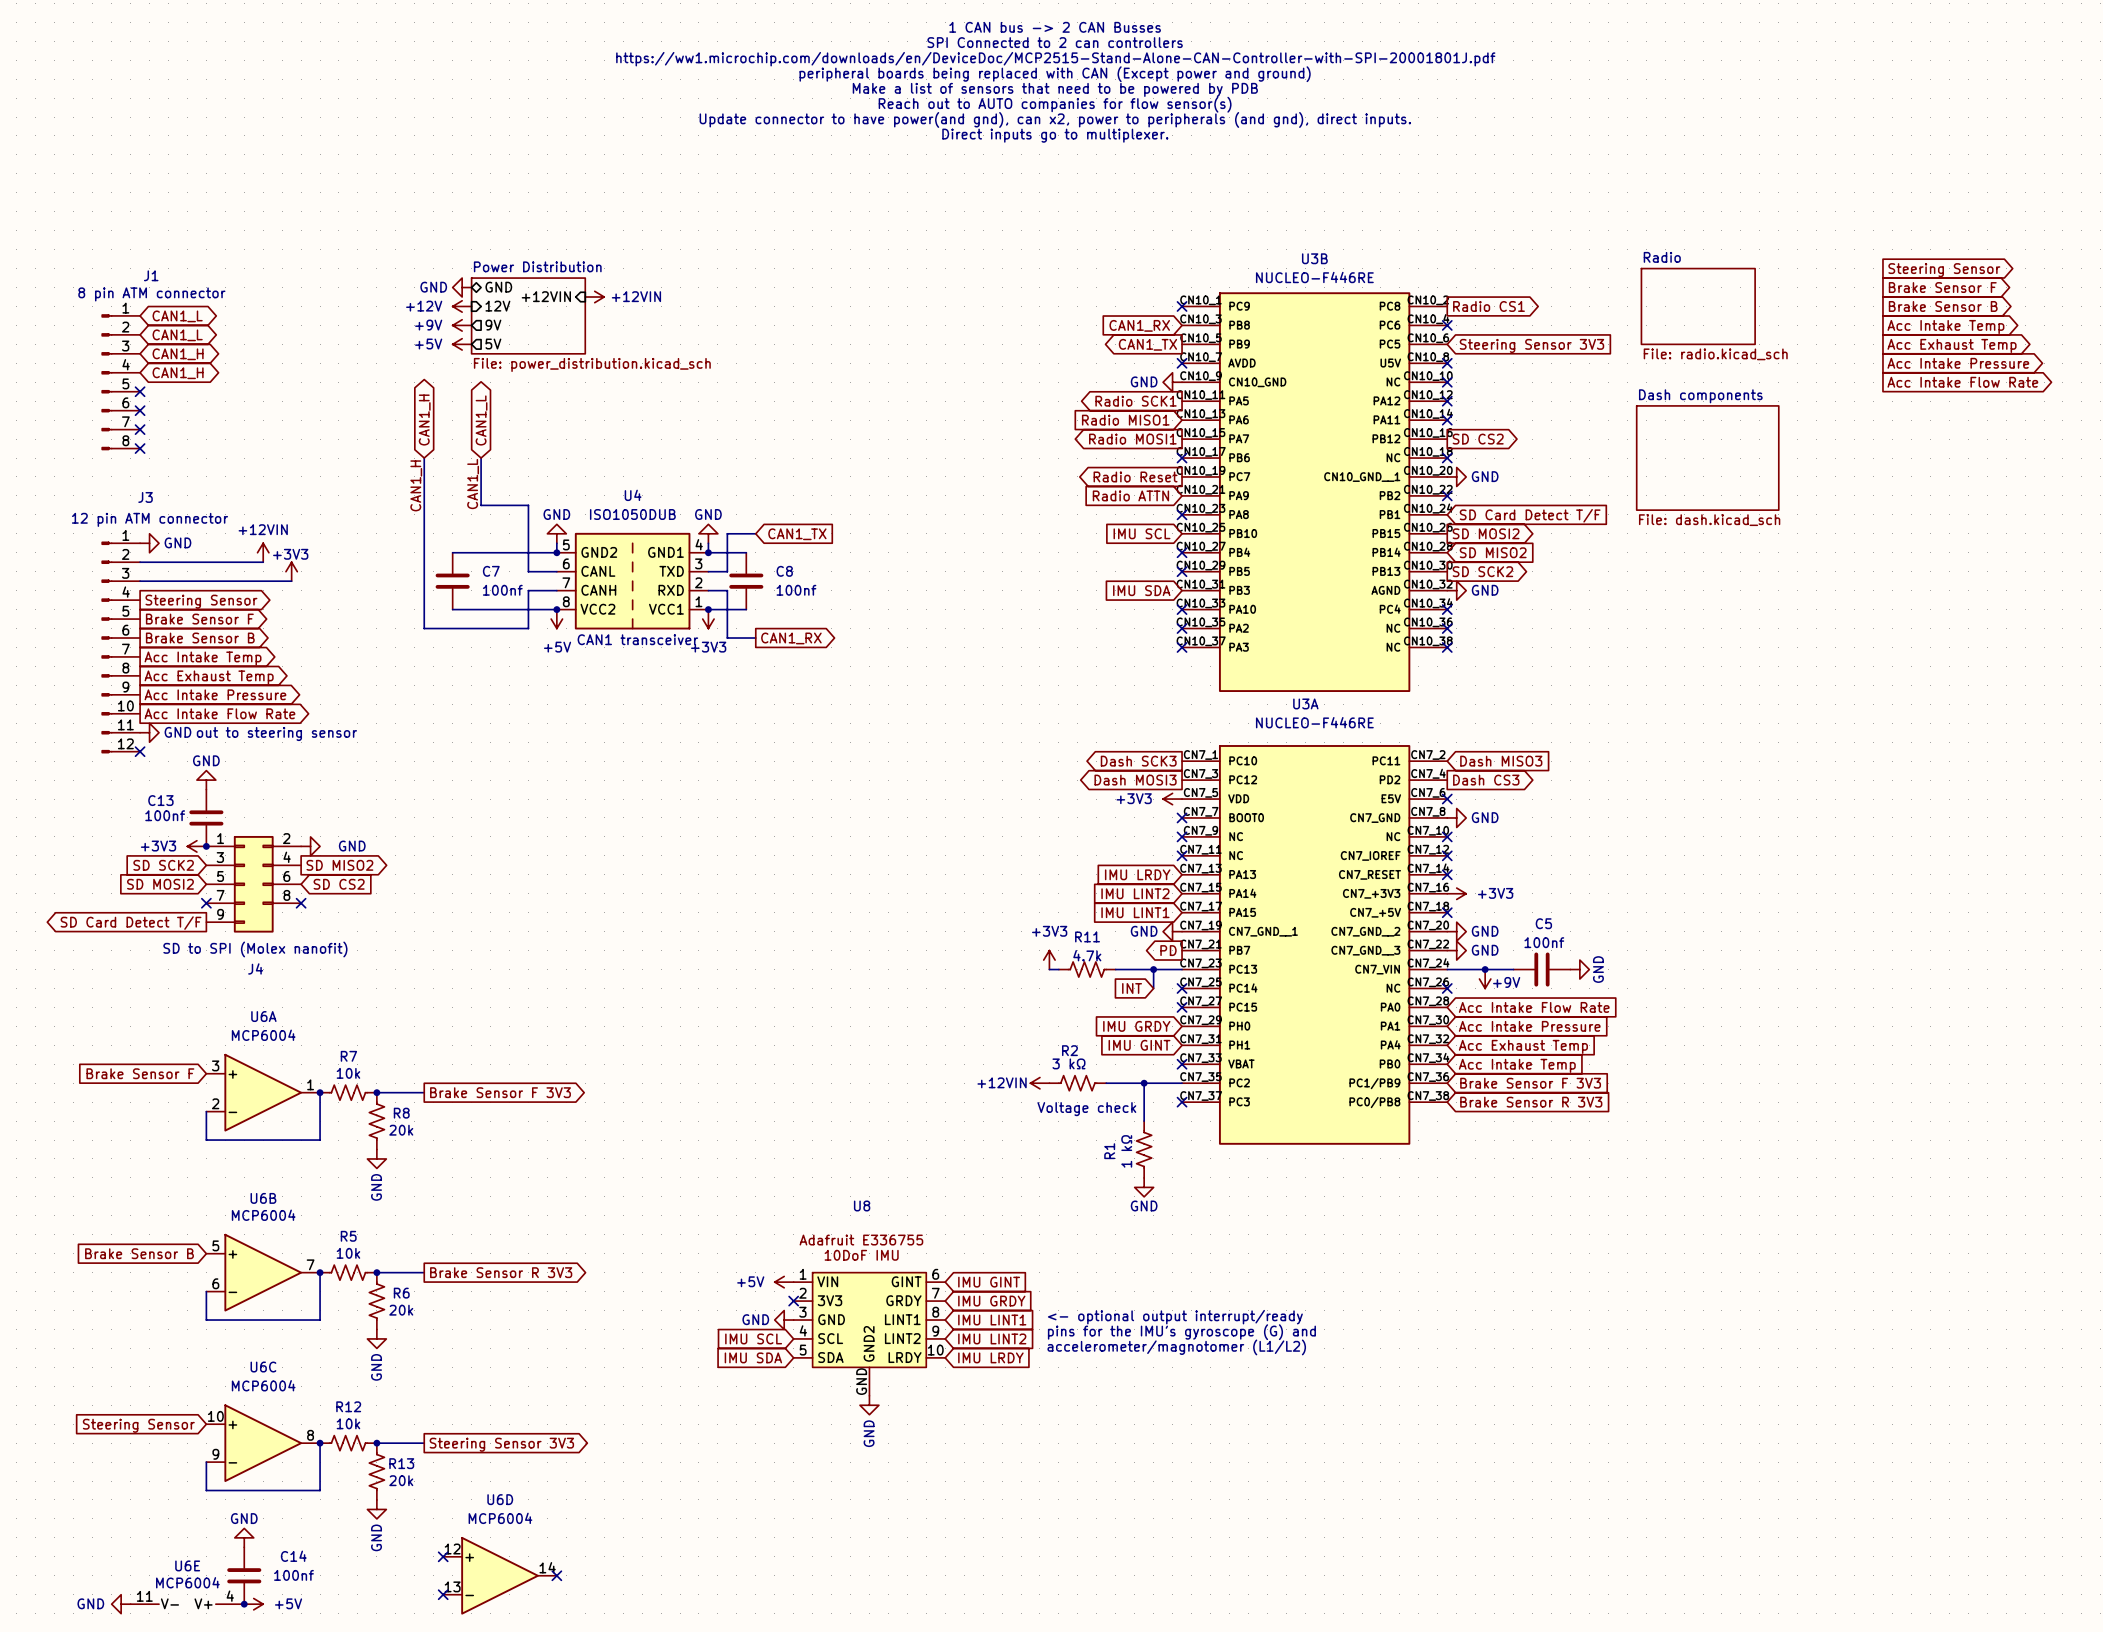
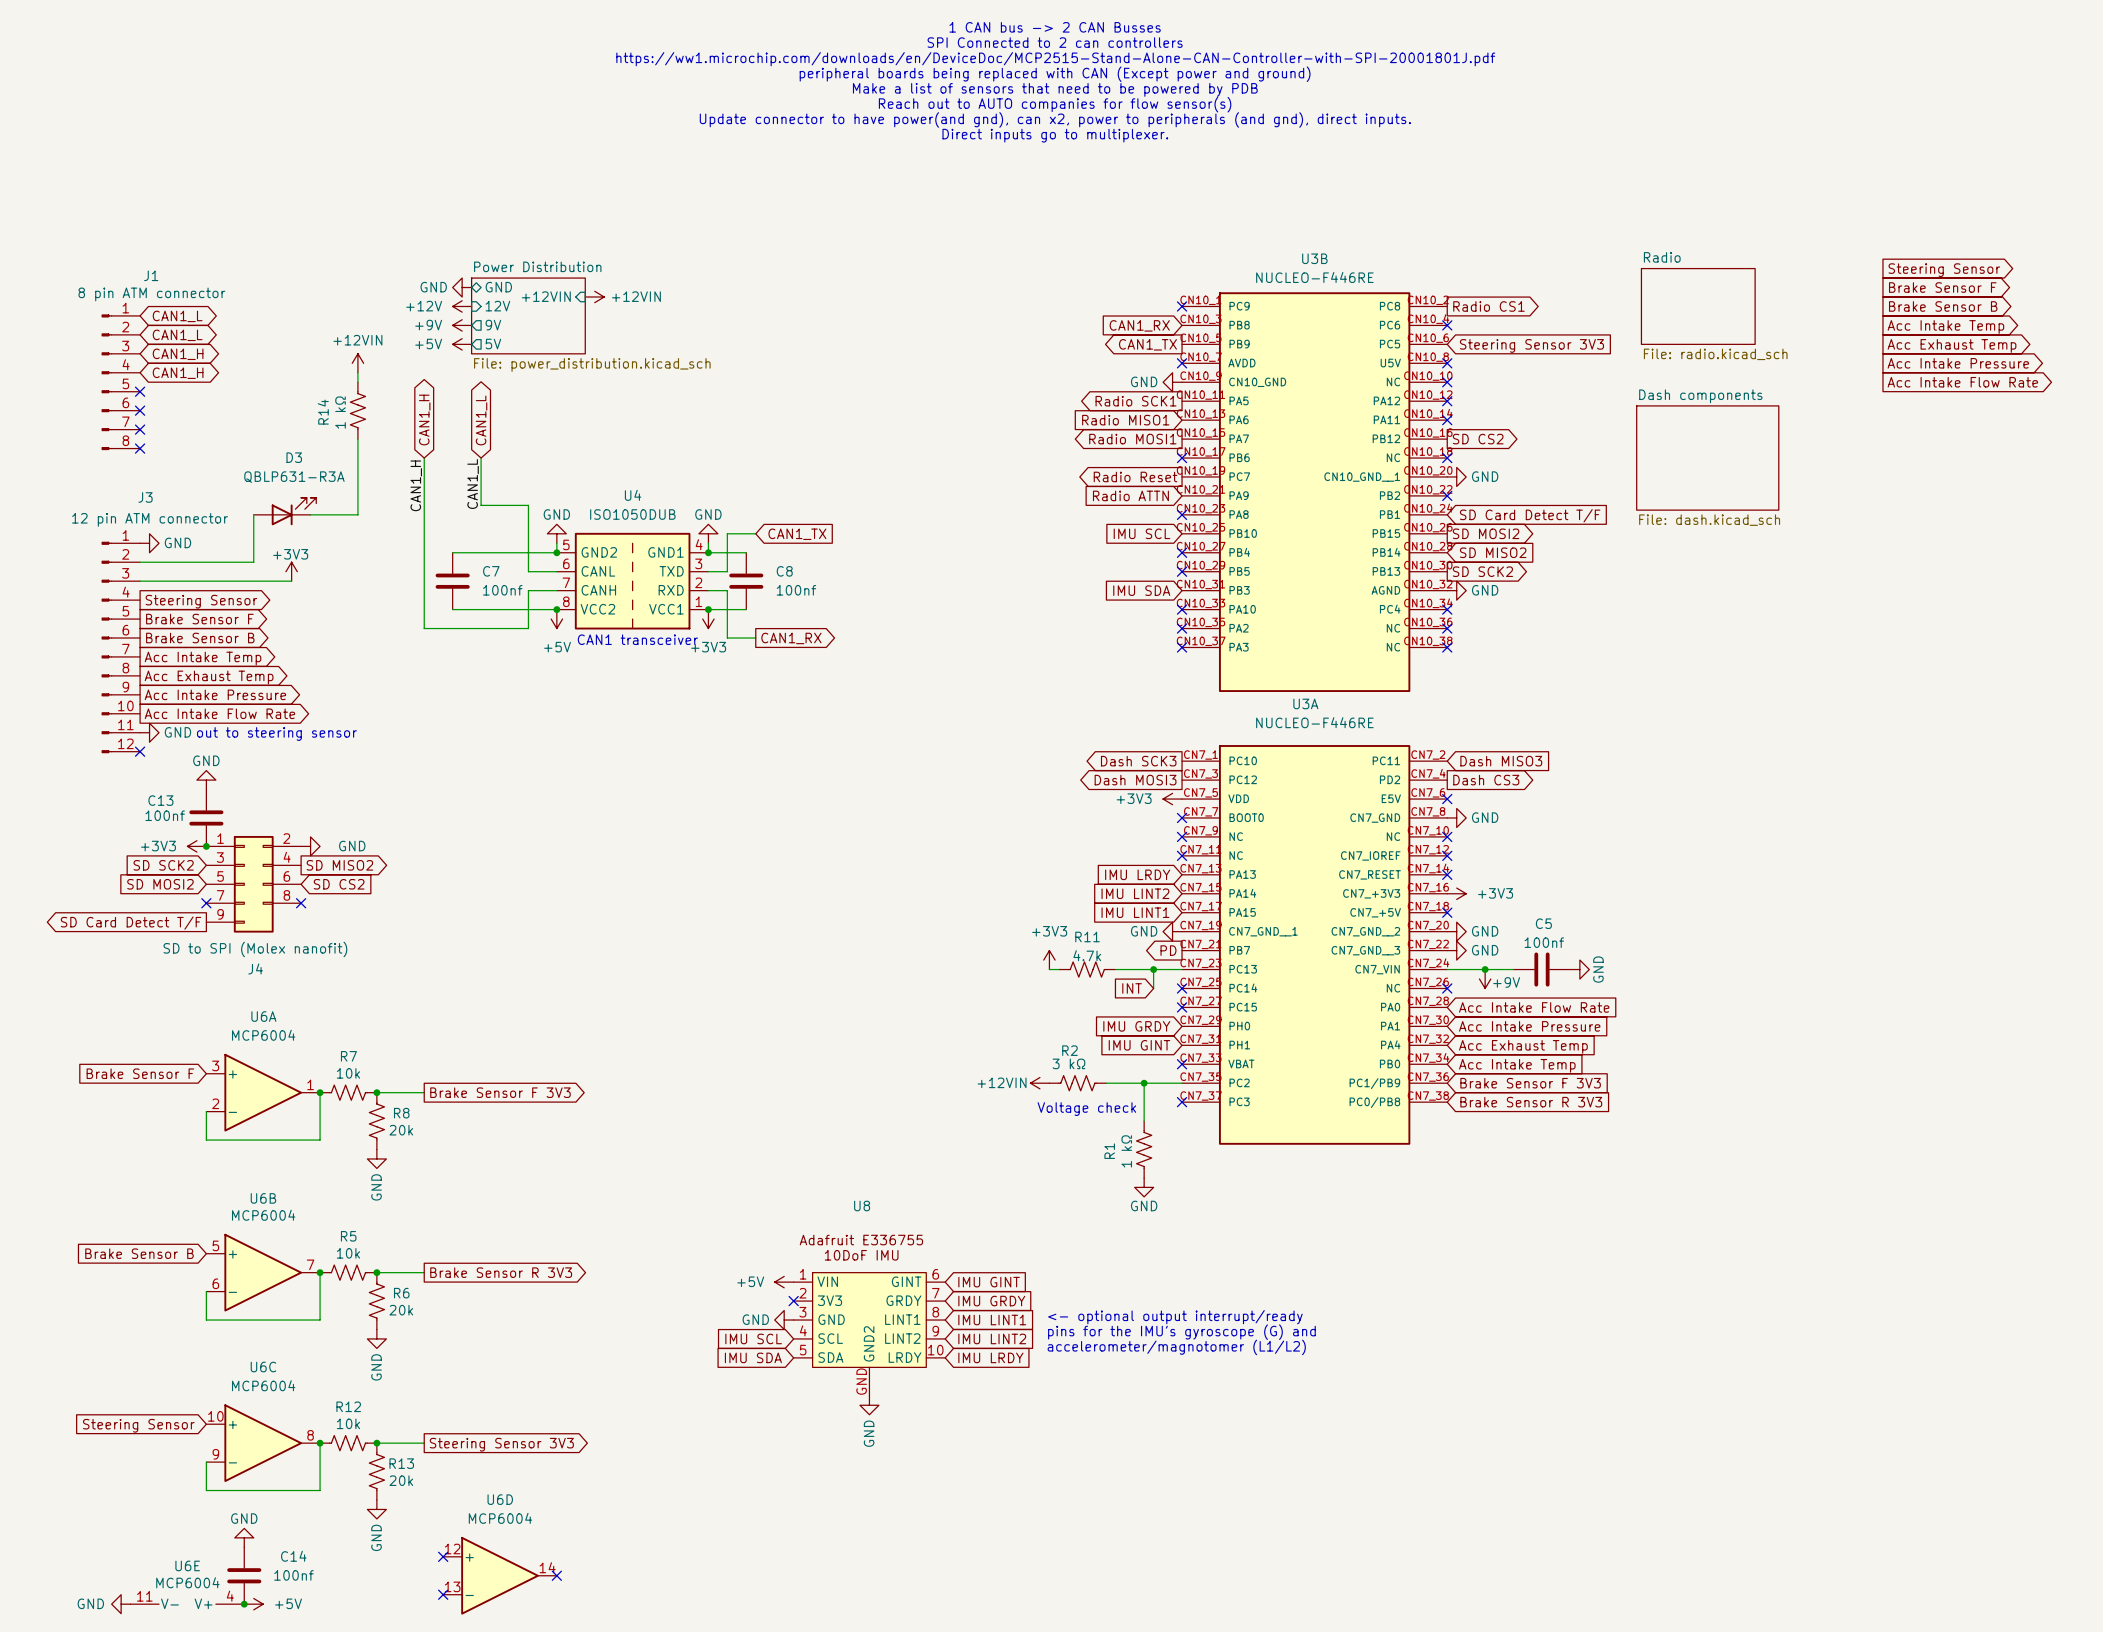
power symbol: none -> +12VIN (357, 363)
wire: none -> (357, 372) (357, 382)
R14: none -> 1 kΩ (357, 410)
wire: none -> (357, 439) (357, 514) (310, 514)
D3: none -> QBLP631-R3A (285, 511)
power symbol: +12VIN (263, 552) -> none
wire: (253, 562) (263, 562) -> (253, 562) (253, 514)

